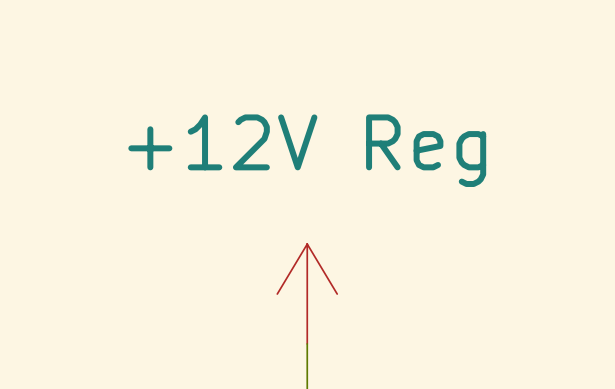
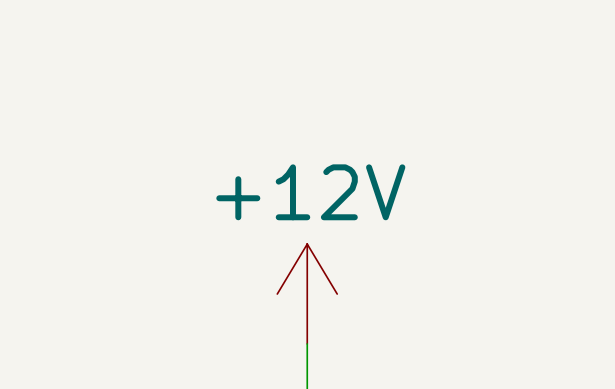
power symbol: +12V Reg (307, 294) -> +12V (307, 294)

